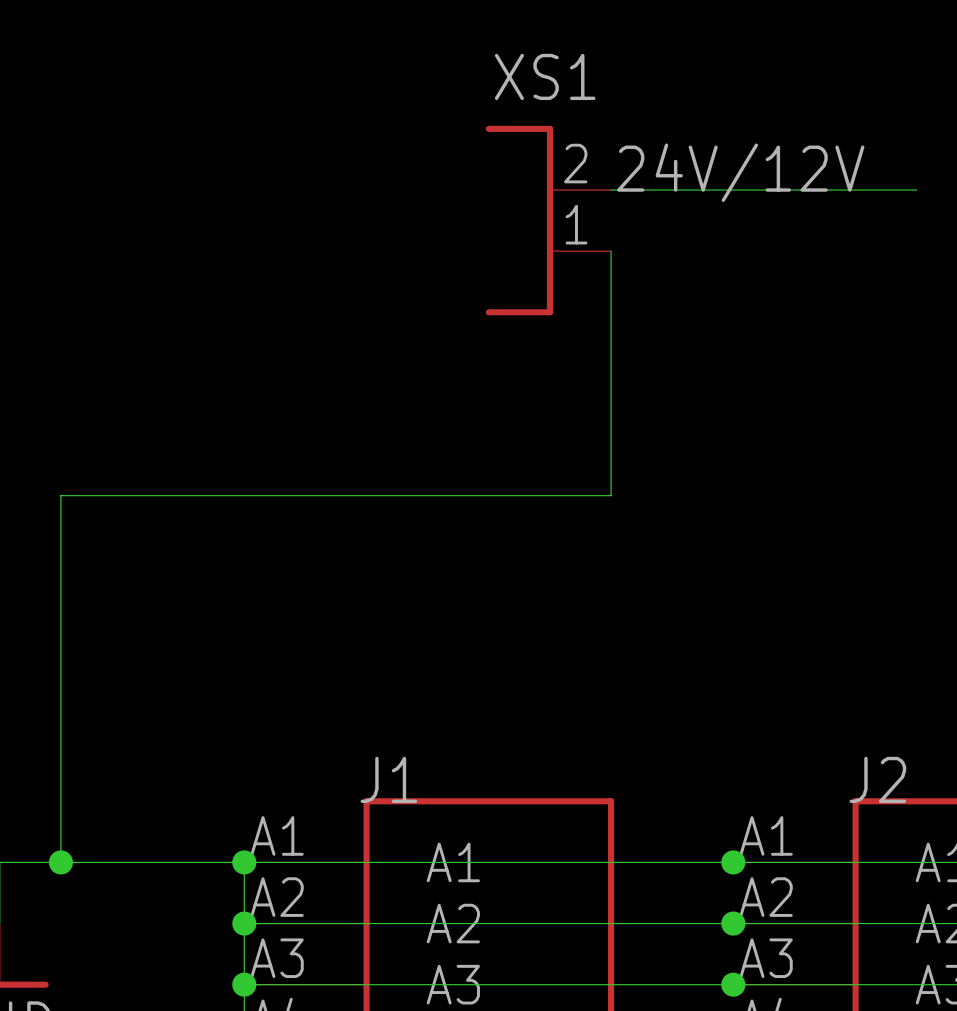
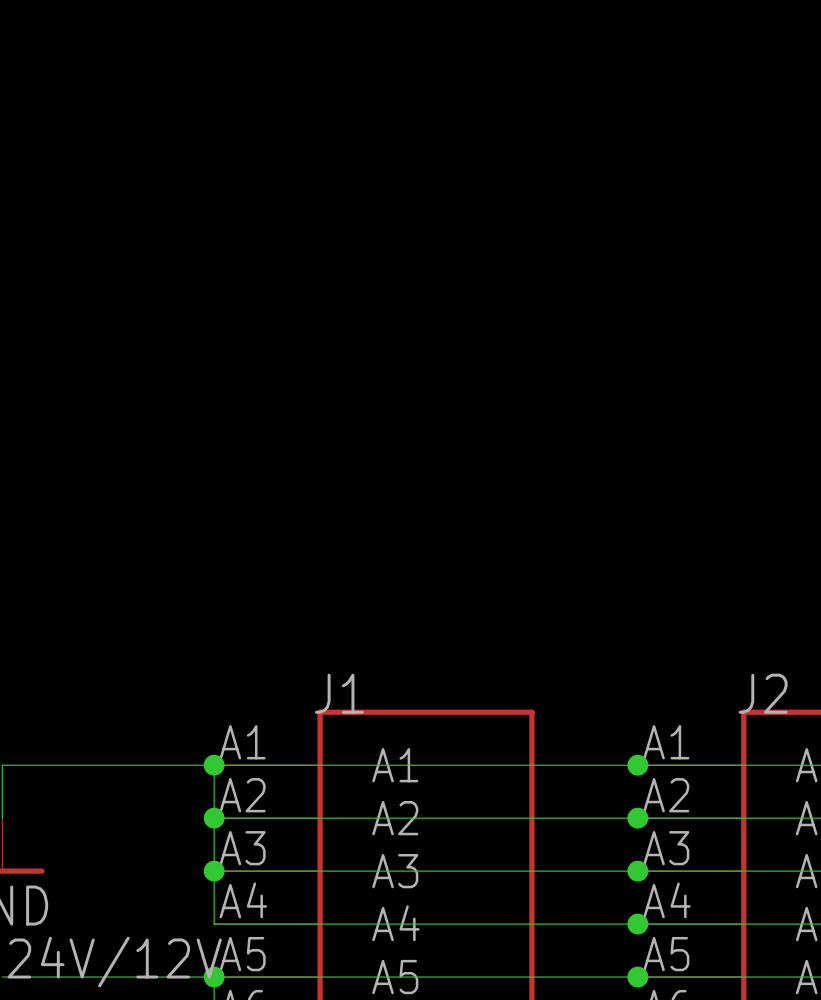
label: 24V/12V (740, 172) -> none
wire: (611, 190) (916, 190) -> none
XS1: (548, 220) -> none
wire: (611, 251) (611, 495) (60, 495) (60, 862) -> none
junction: (60, 862) -> none

